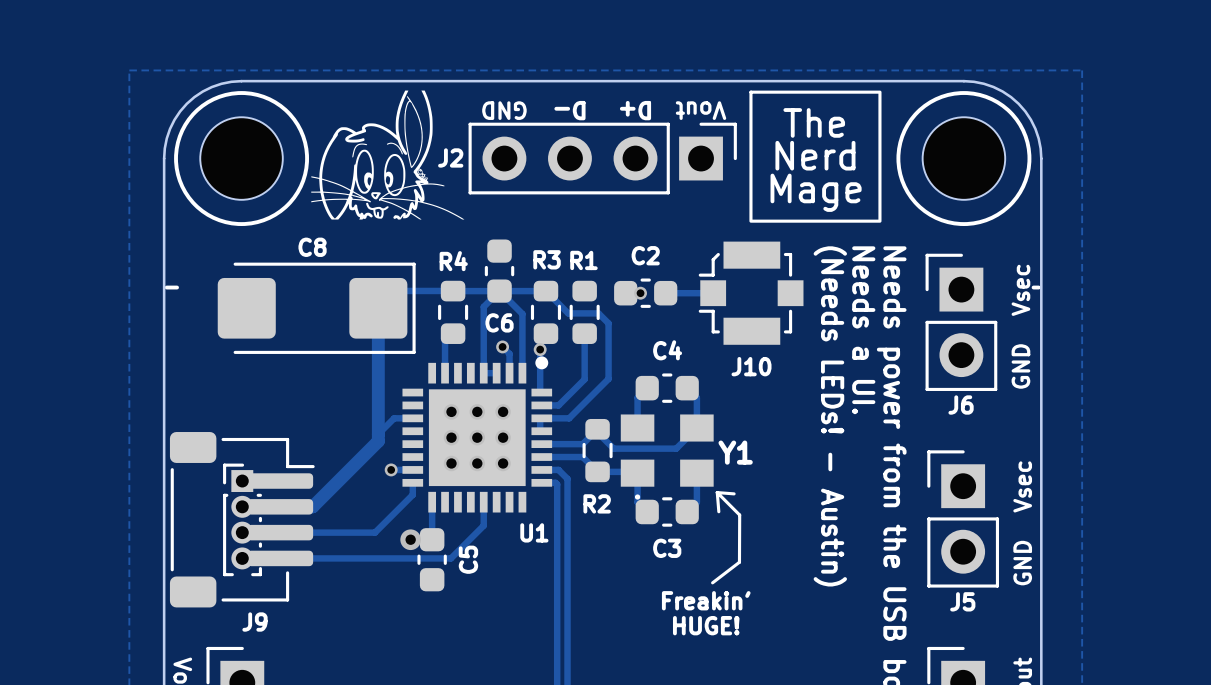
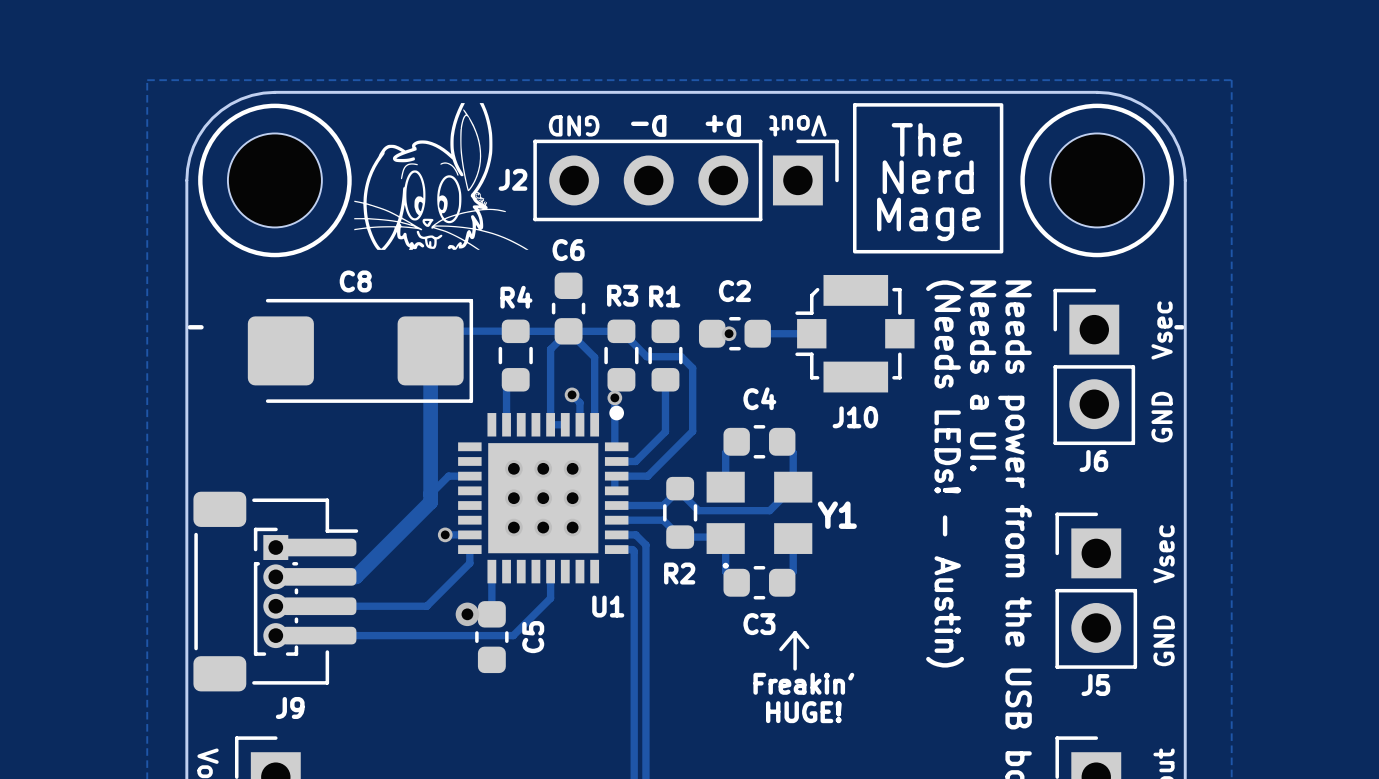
C6 name position: C6 (499, 322) -> C6 (568, 250)
line: (717, 492) (739, 515) (739, 562) (712, 582) -> none
line: (717, 492) (718, 511) -> none
line: (717, 492) (734, 493) -> none
line: none -> (795, 632) (795, 668)
line: none -> (795, 632) (780, 649)
line: none -> (795, 632) (807, 647)

